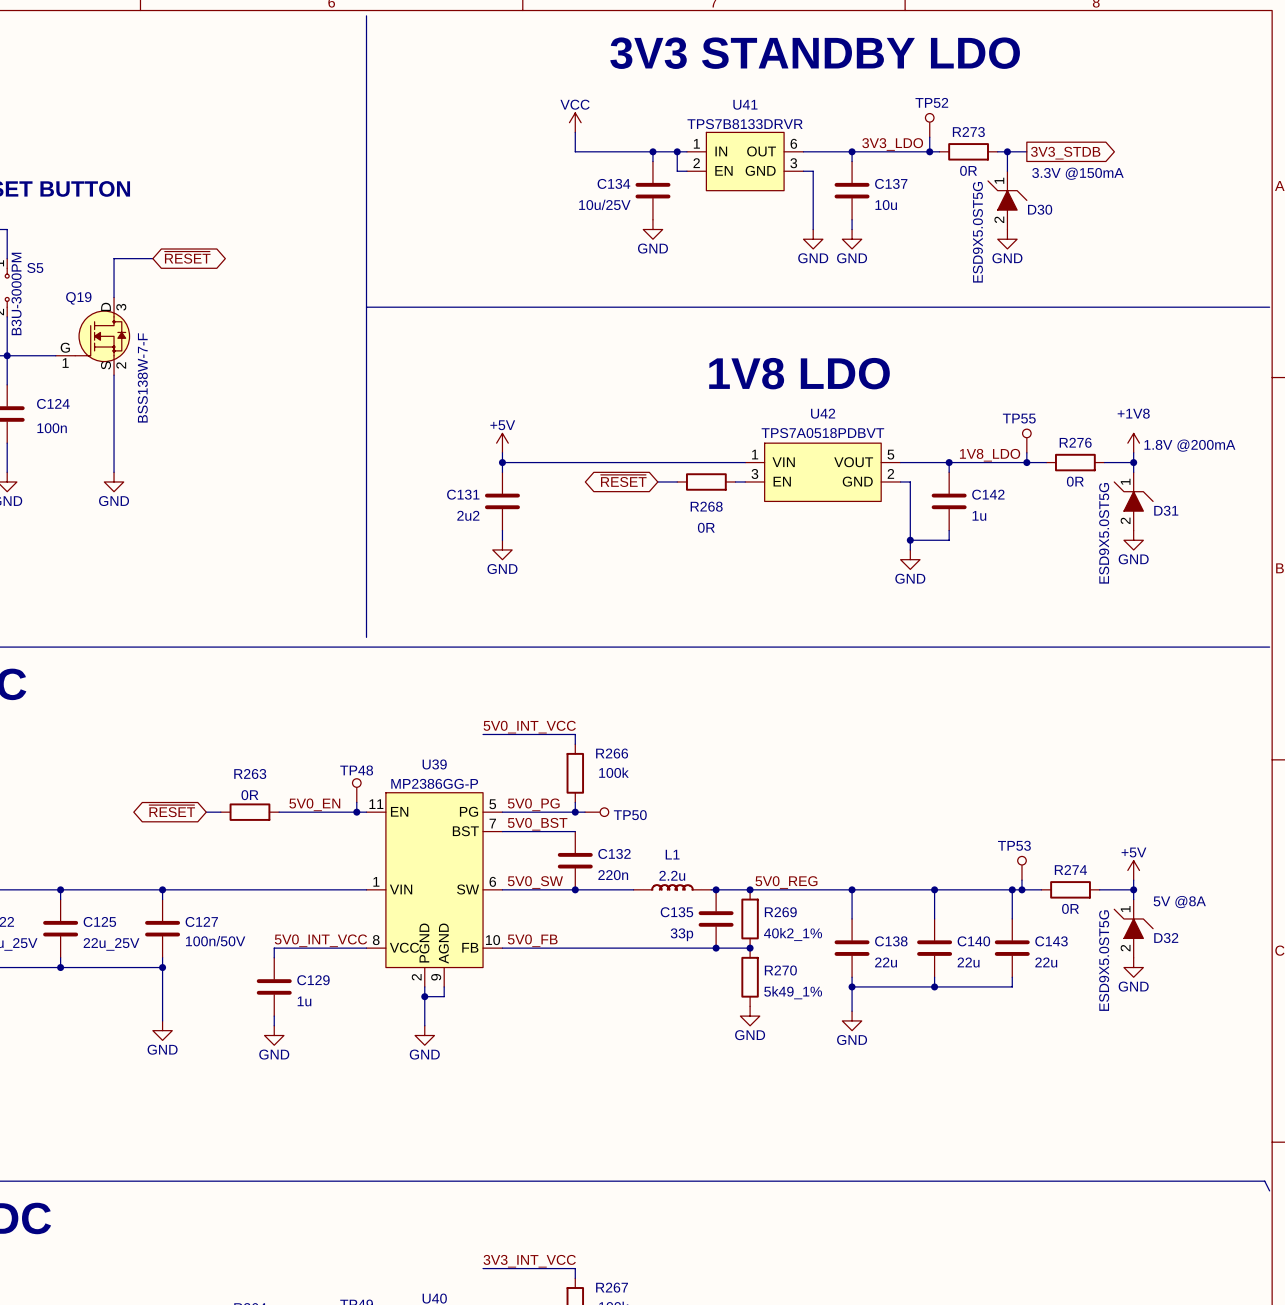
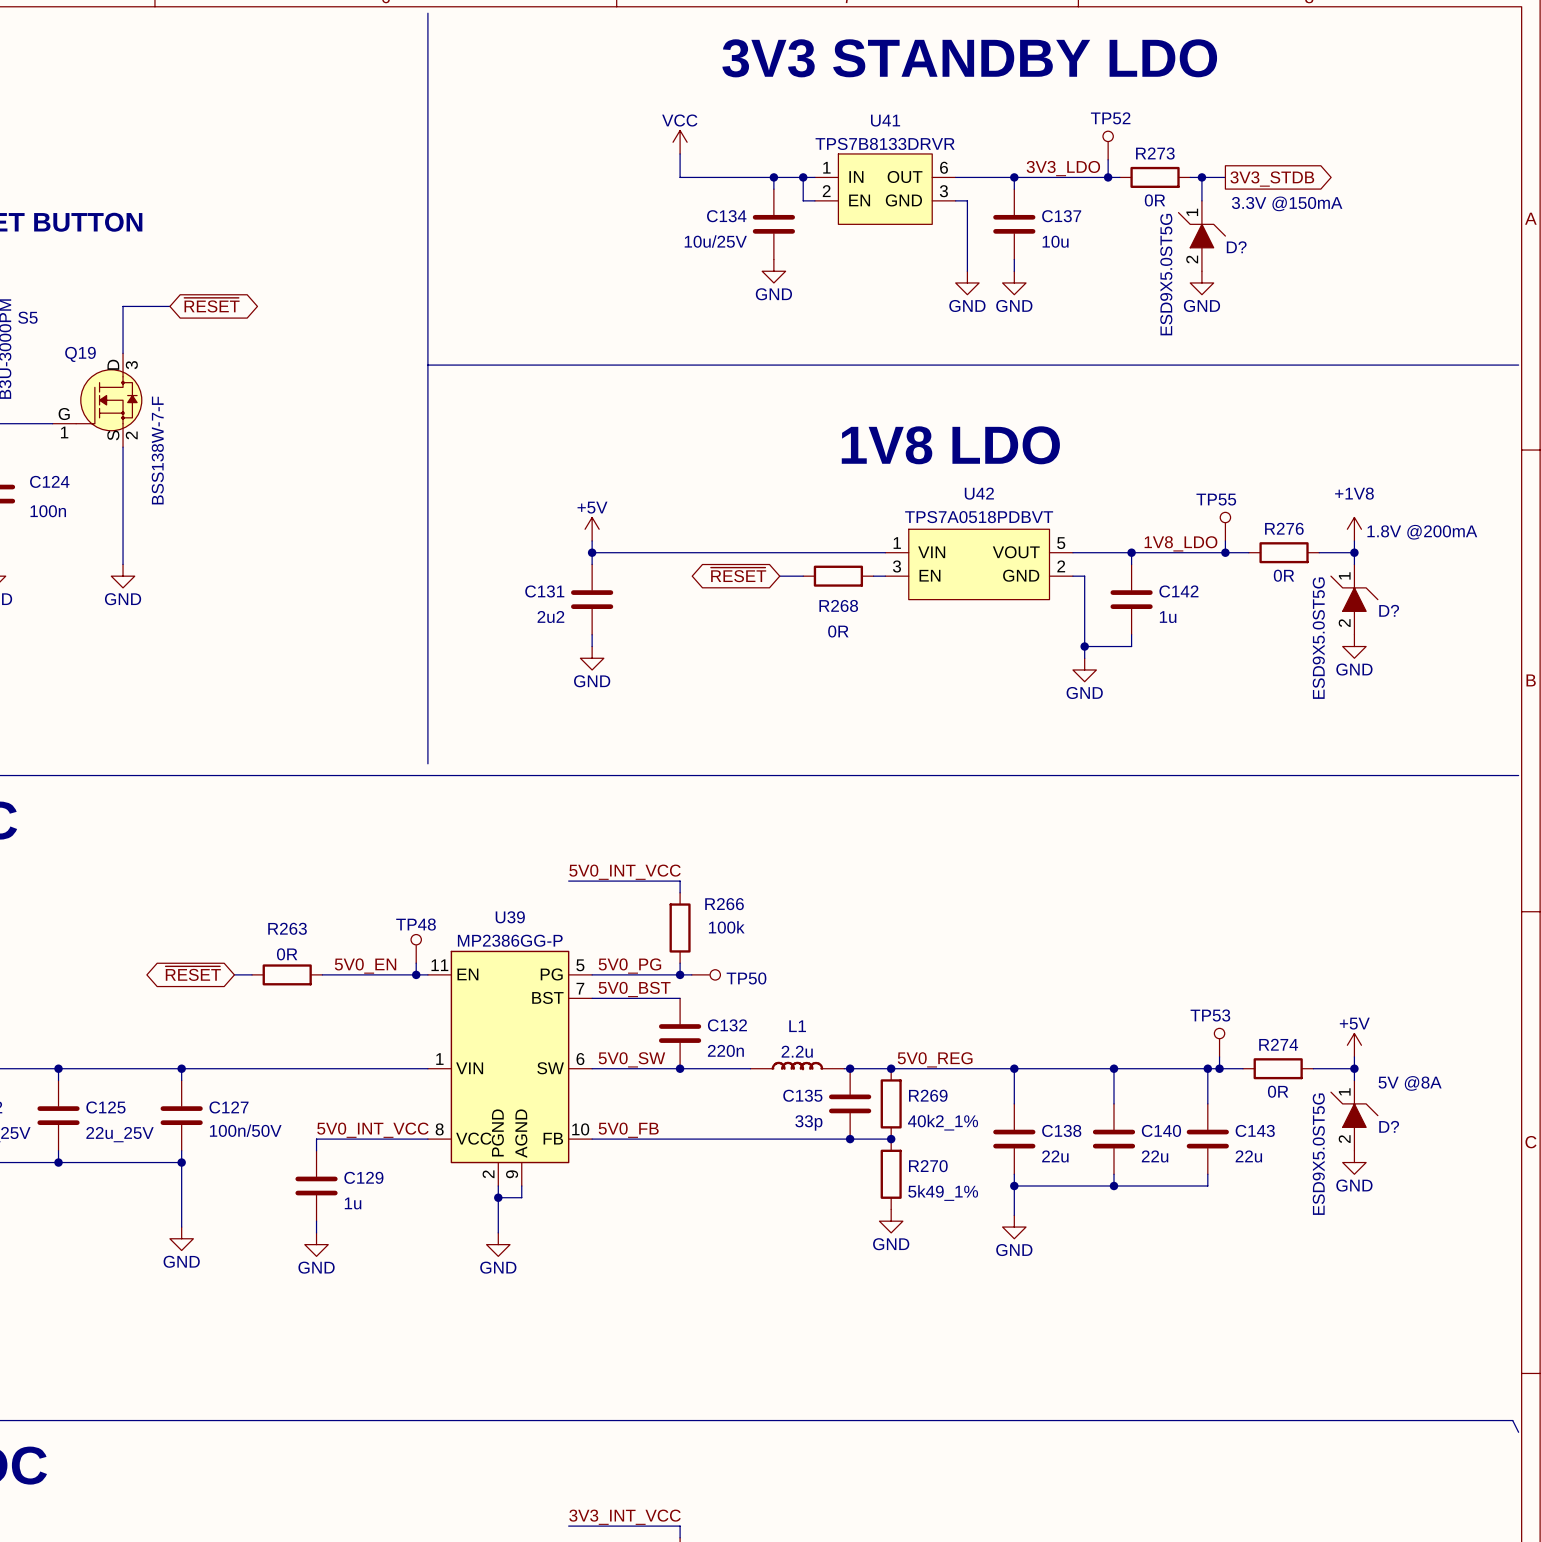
D30 name: D30 (1040, 209) -> D? (1236, 247)
D31 name: D31 (1166, 510) -> D? (1389, 610)
D32 name: D32 (1166, 938) -> D? (1389, 1126)

